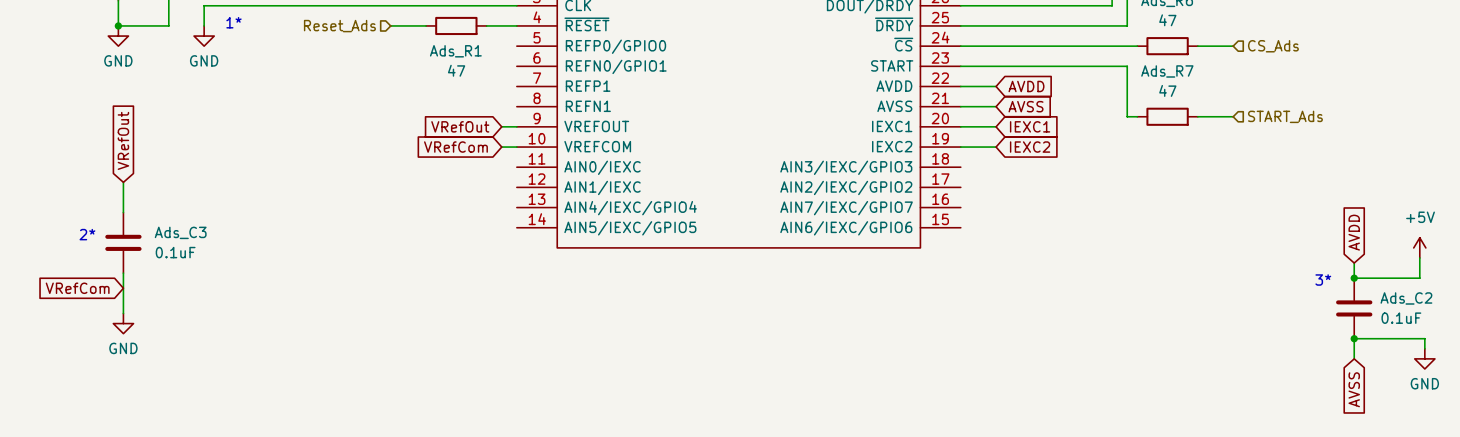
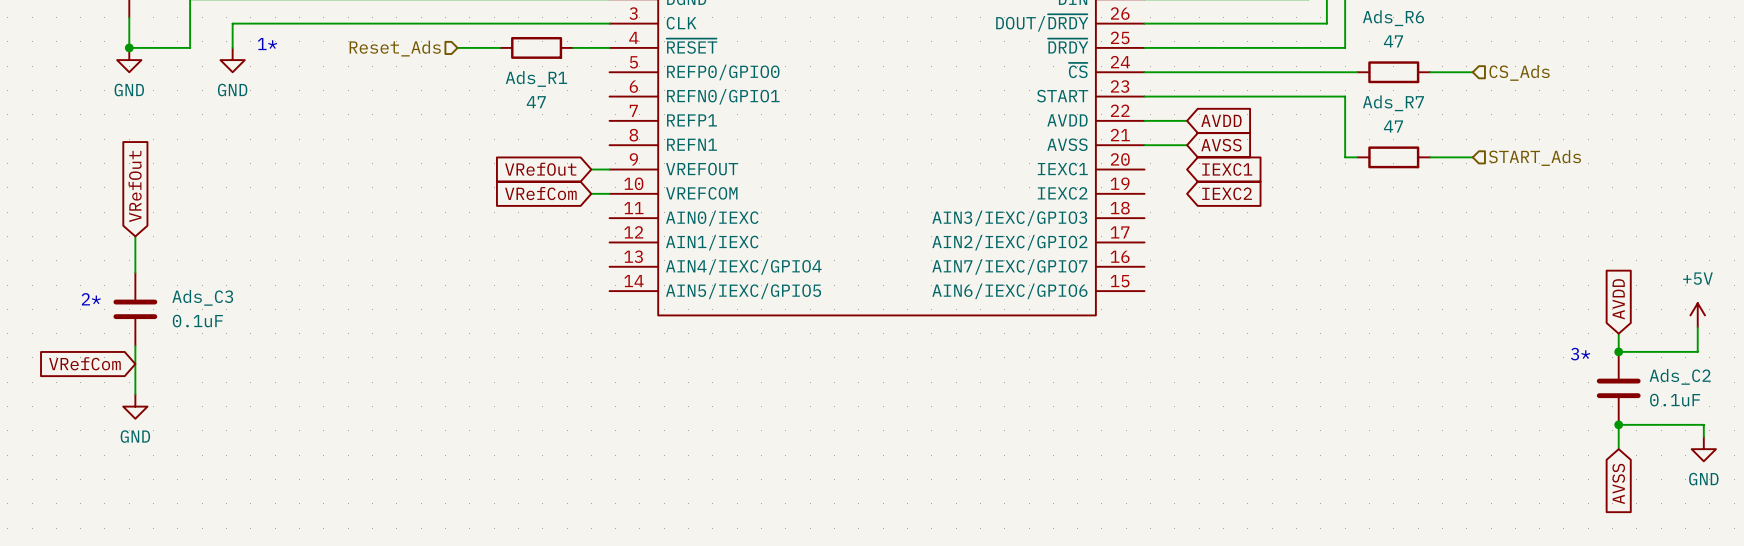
wire: (960, 126) (996, 126) -> none
wire: (960, 147) (996, 147) -> none

